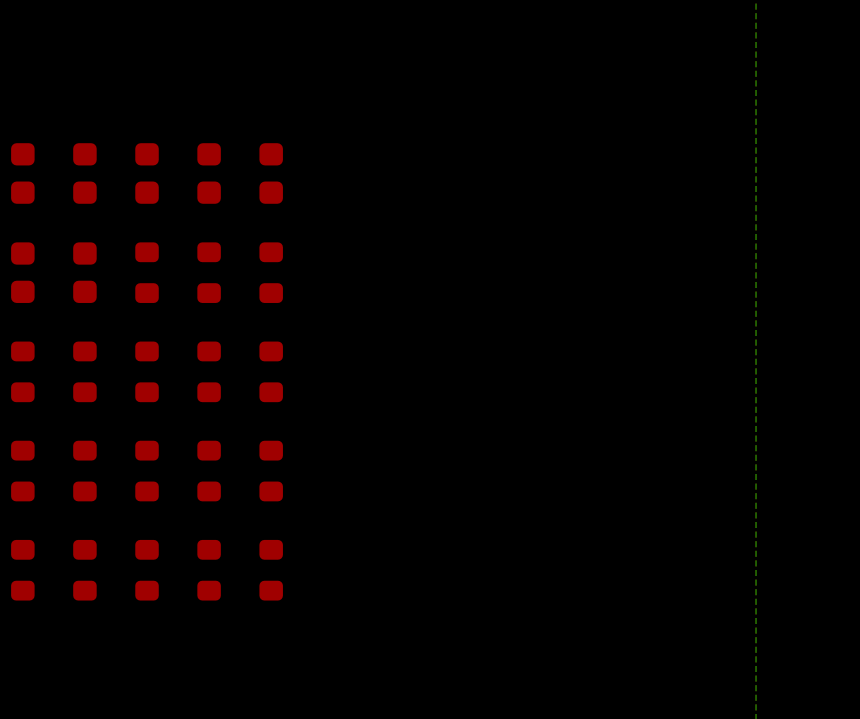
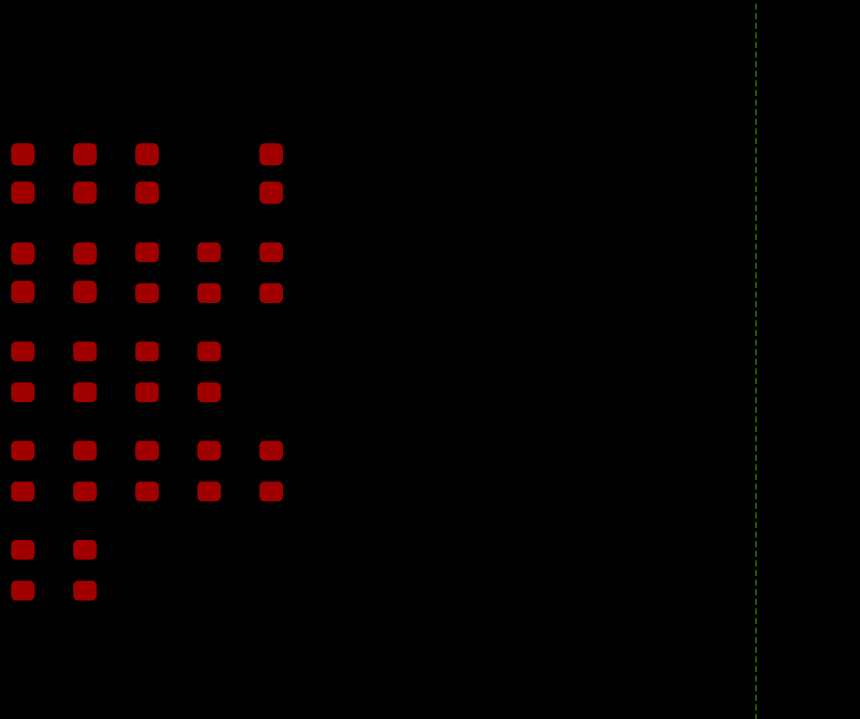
part: (209, 173) -> none
part: (271, 371) -> none
part: (147, 570) -> none
part: (209, 570) -> none
part: (271, 570) -> none

